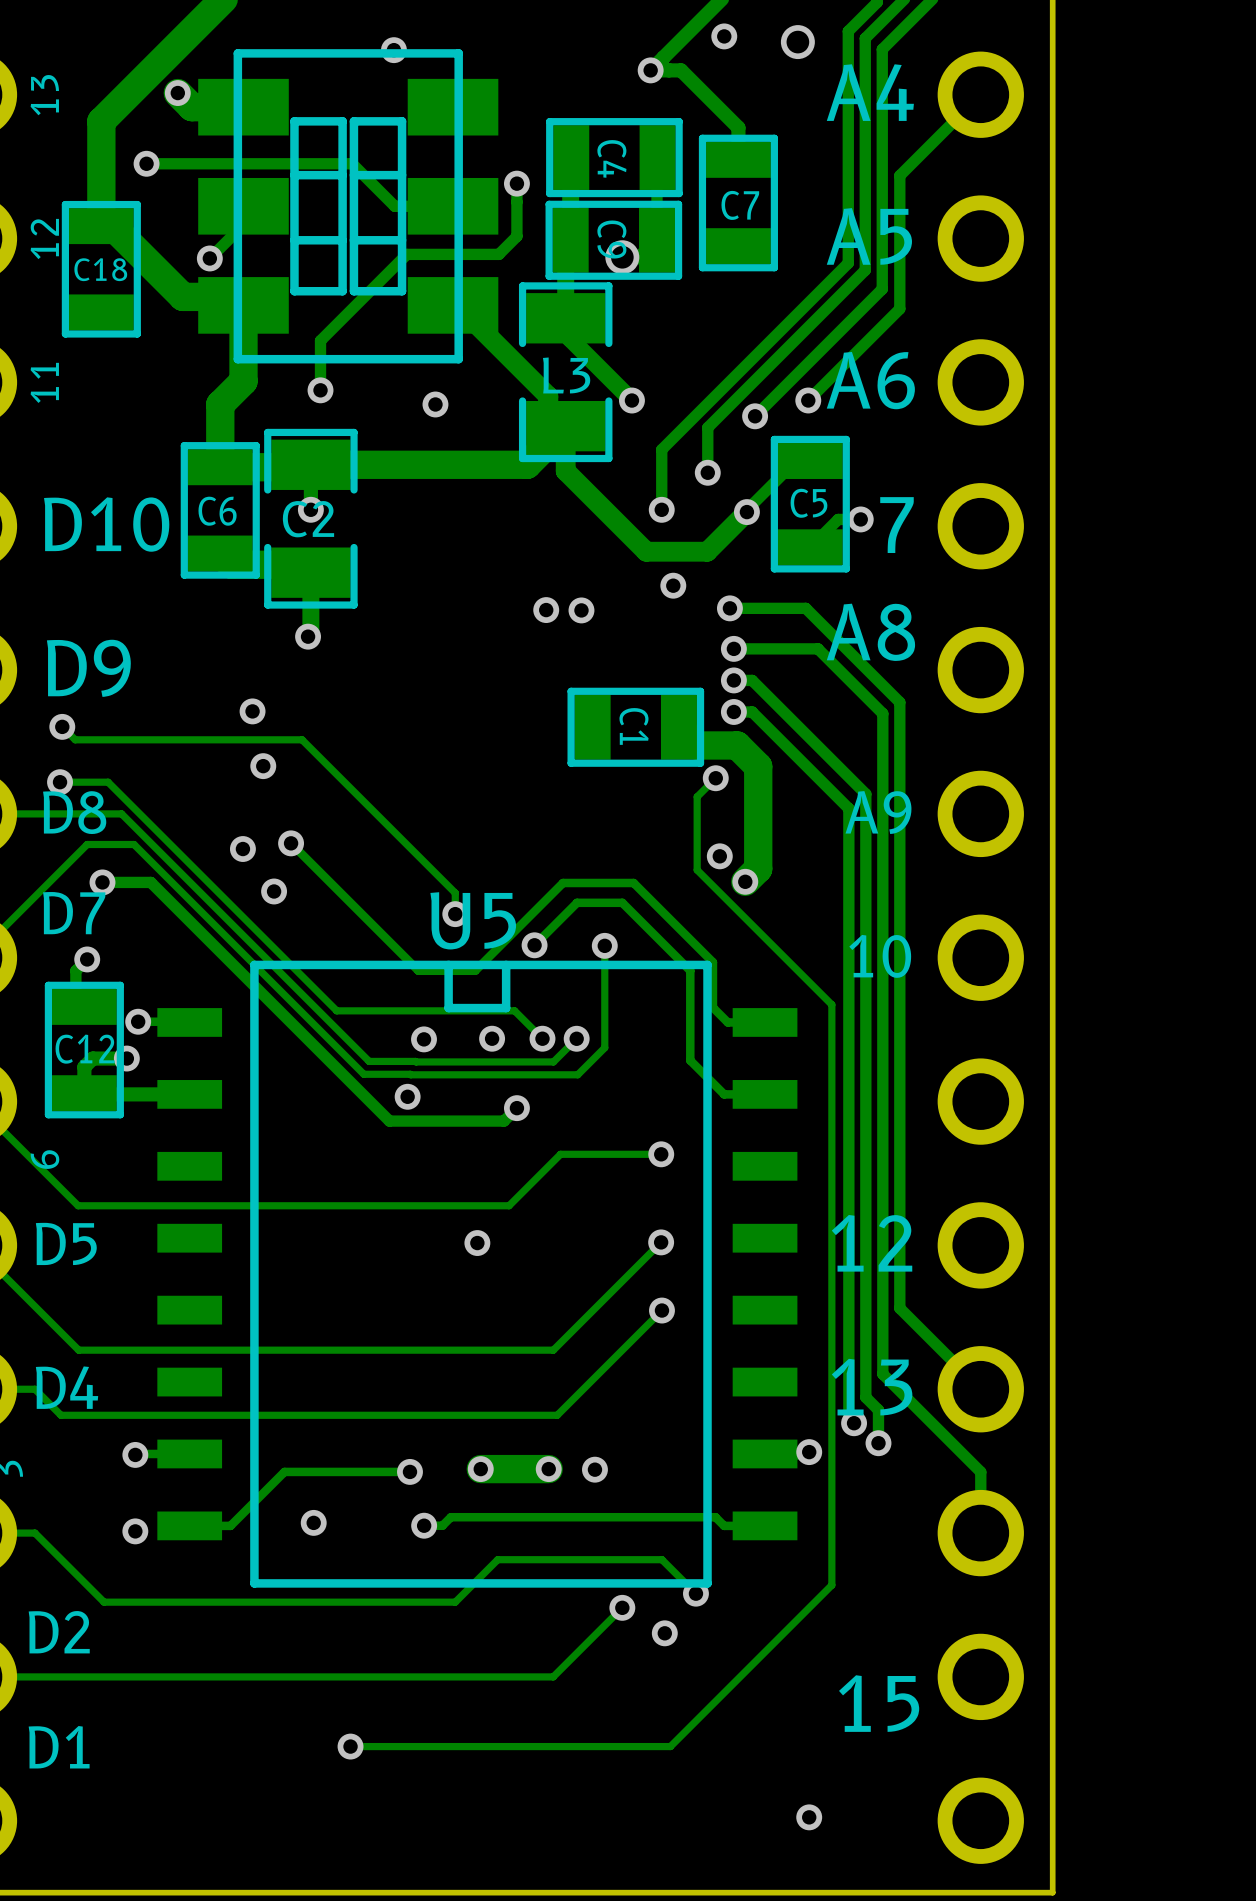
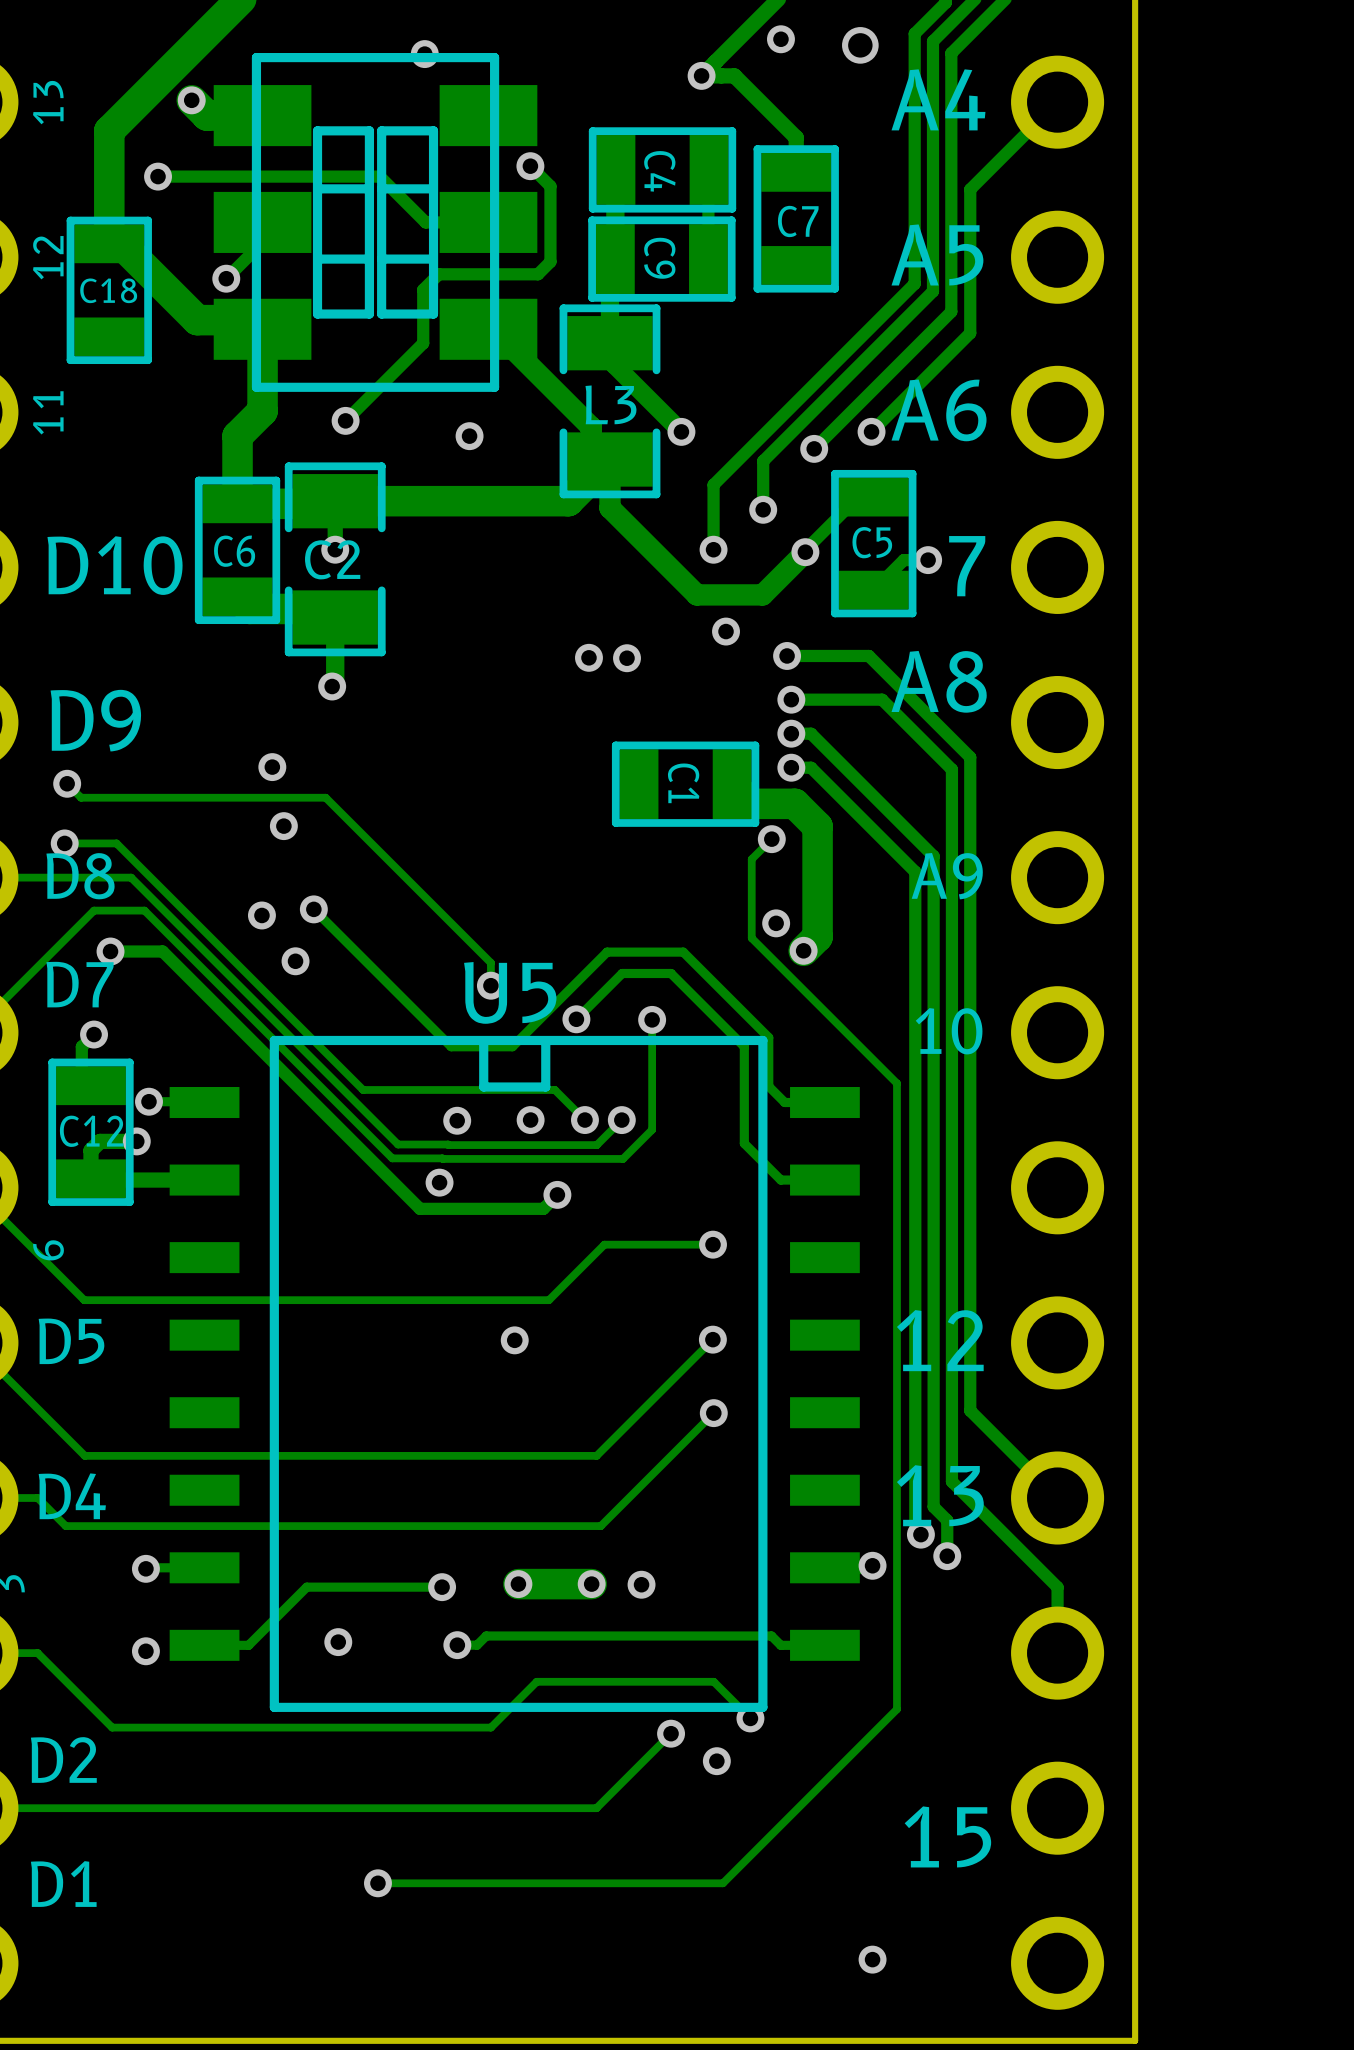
track: (516, 183) (516, 236) (510, 242) -> (530, 166) (550, 186) (550, 261)
via position: (516, 183) -> (530, 166)
via: (622, 257) -> none
track: (392, 268) (320, 340) (320, 390) -> (423, 289) (423, 343) (345, 420)

